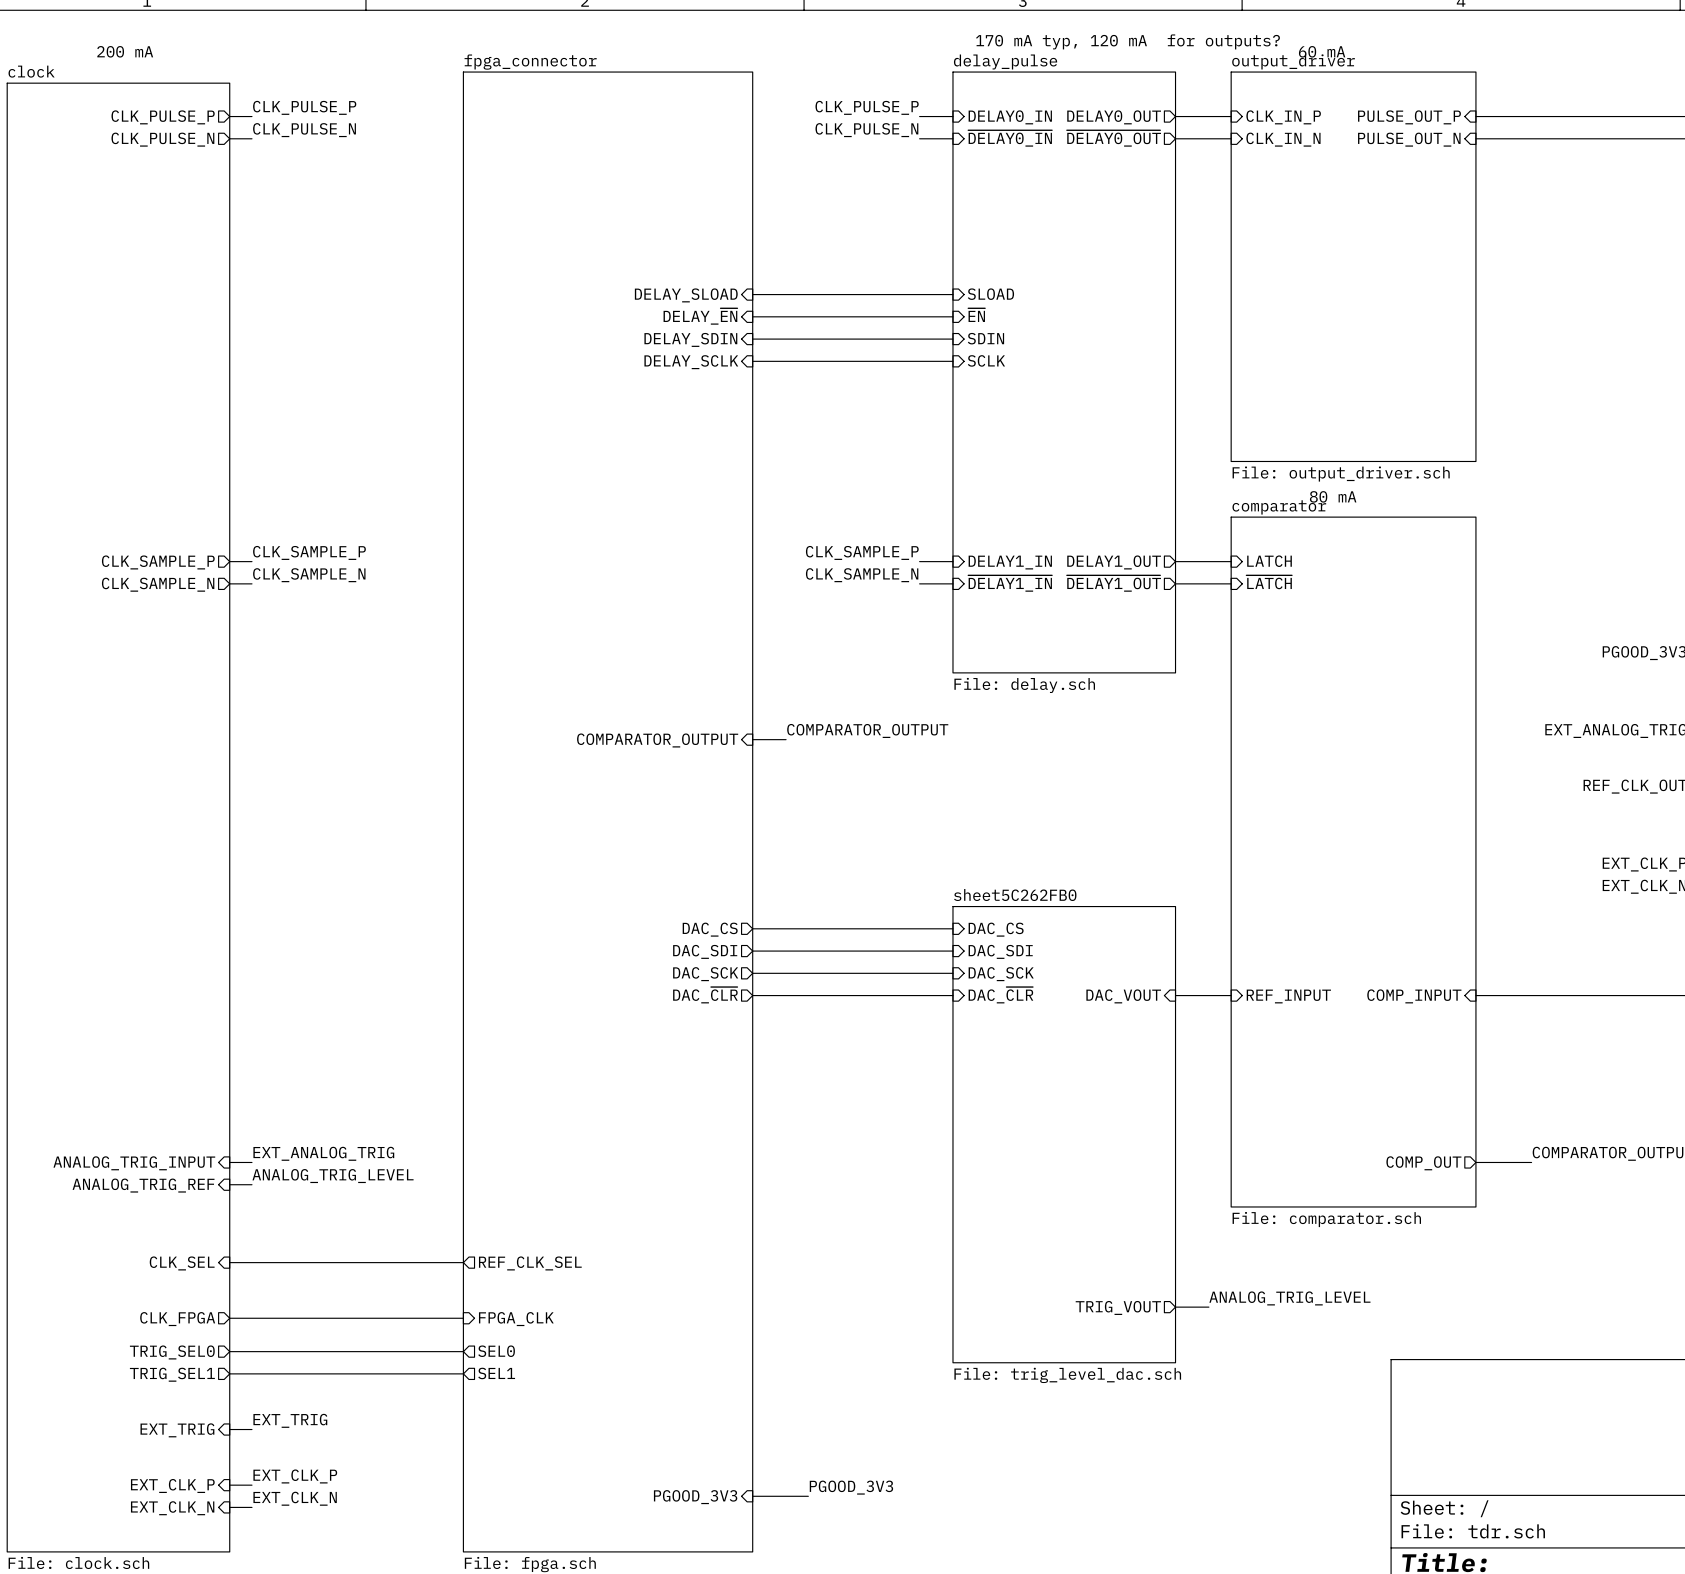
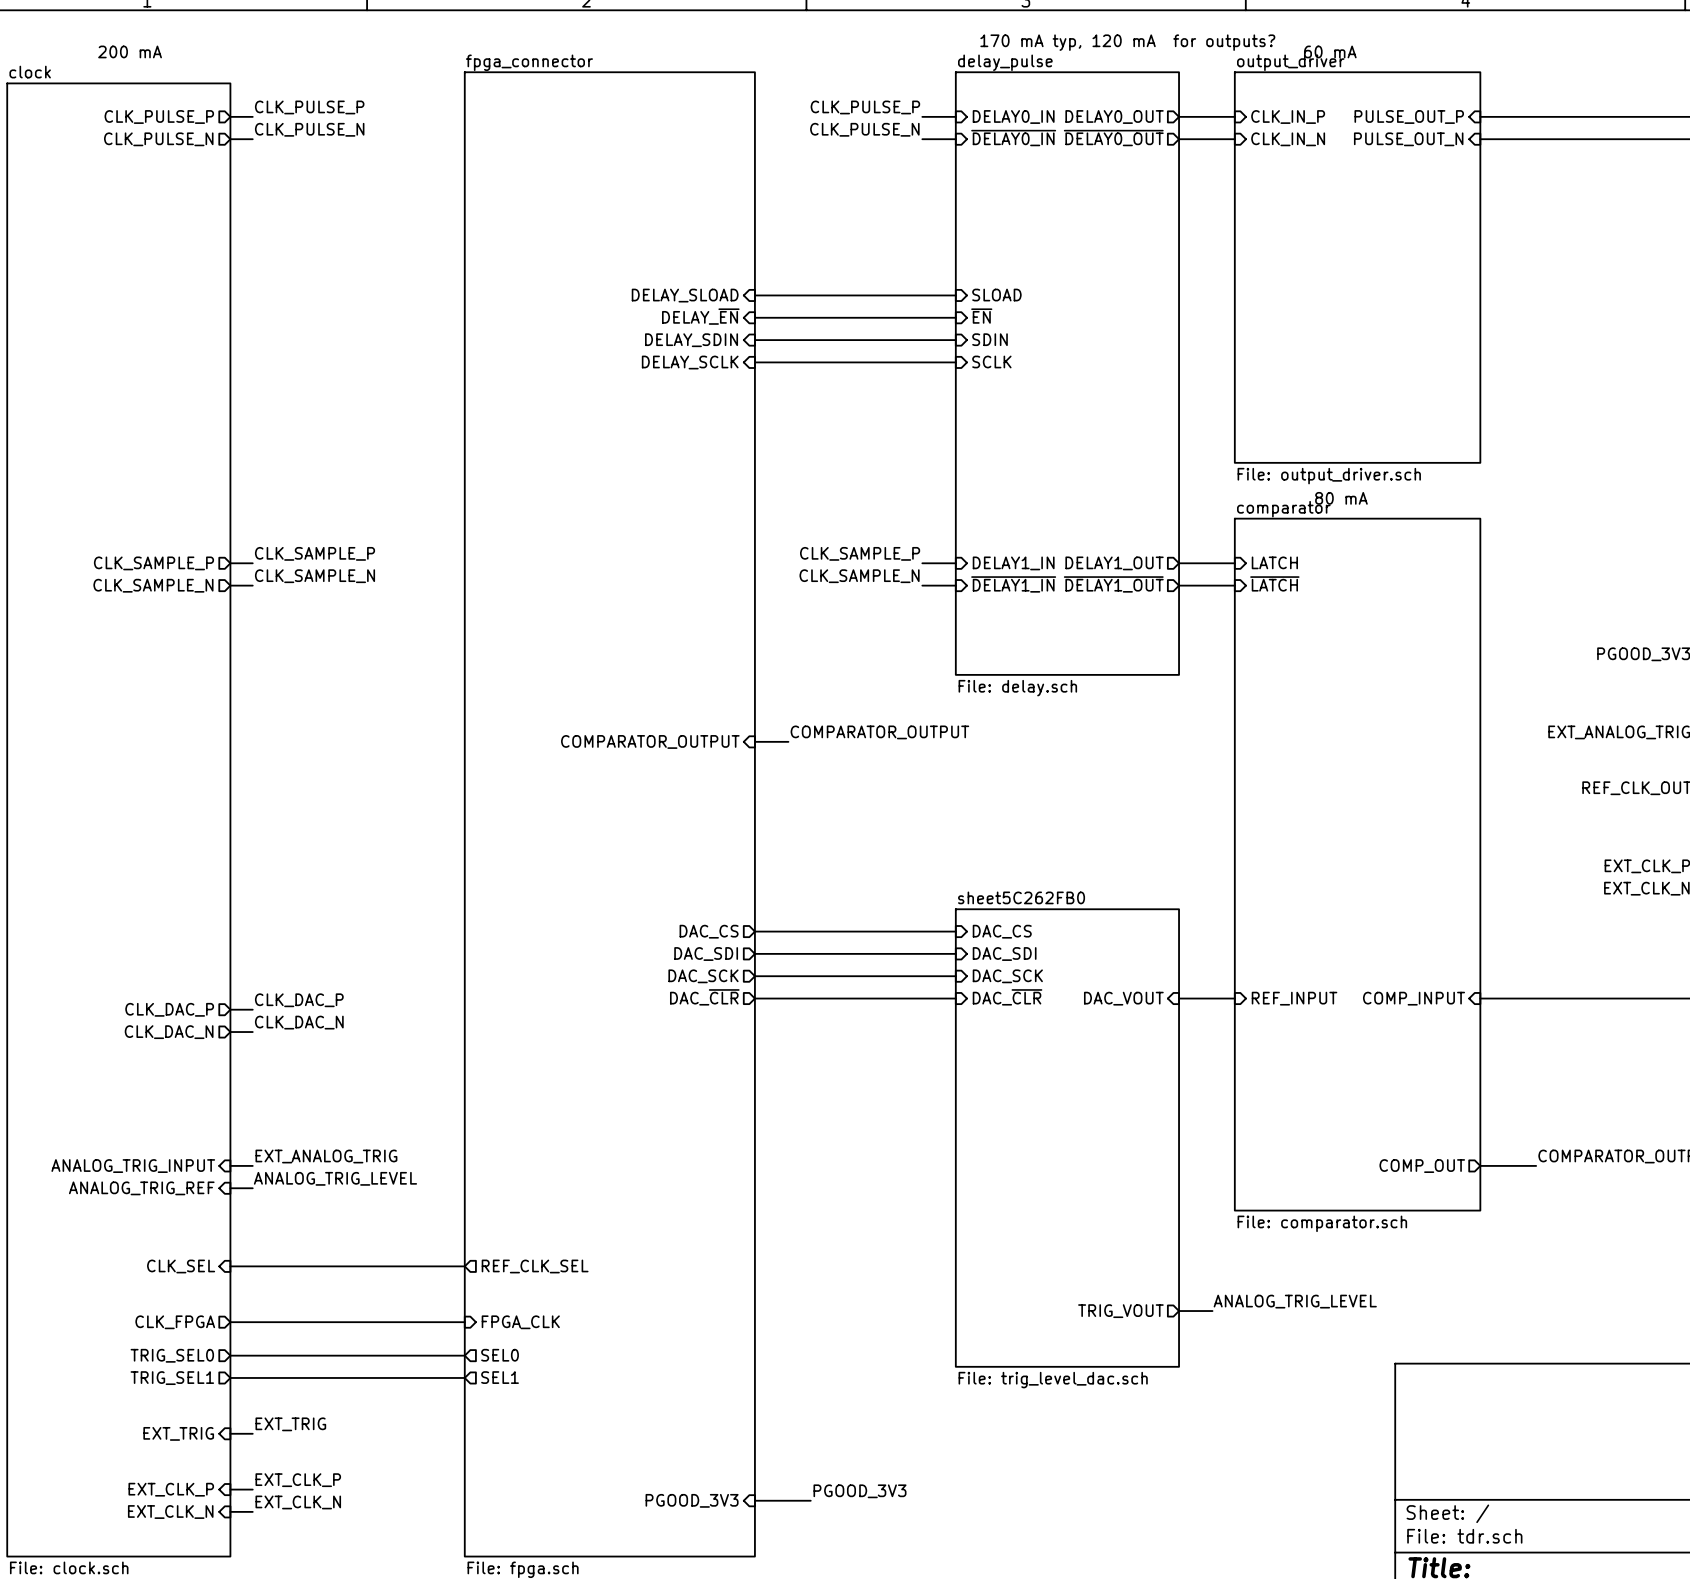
label: none -> CLK_DAC_P (299, 1000)
wire: none -> (230, 1009) (252, 1009)
sheet pin: none -> CLK_DAC_P (169, 1009)
label: none -> CLK_DAC_N (299, 1022)
wire: none -> (230, 1032) (252, 1032)
sheet pin: none -> CLK_DAC_N (169, 1032)

